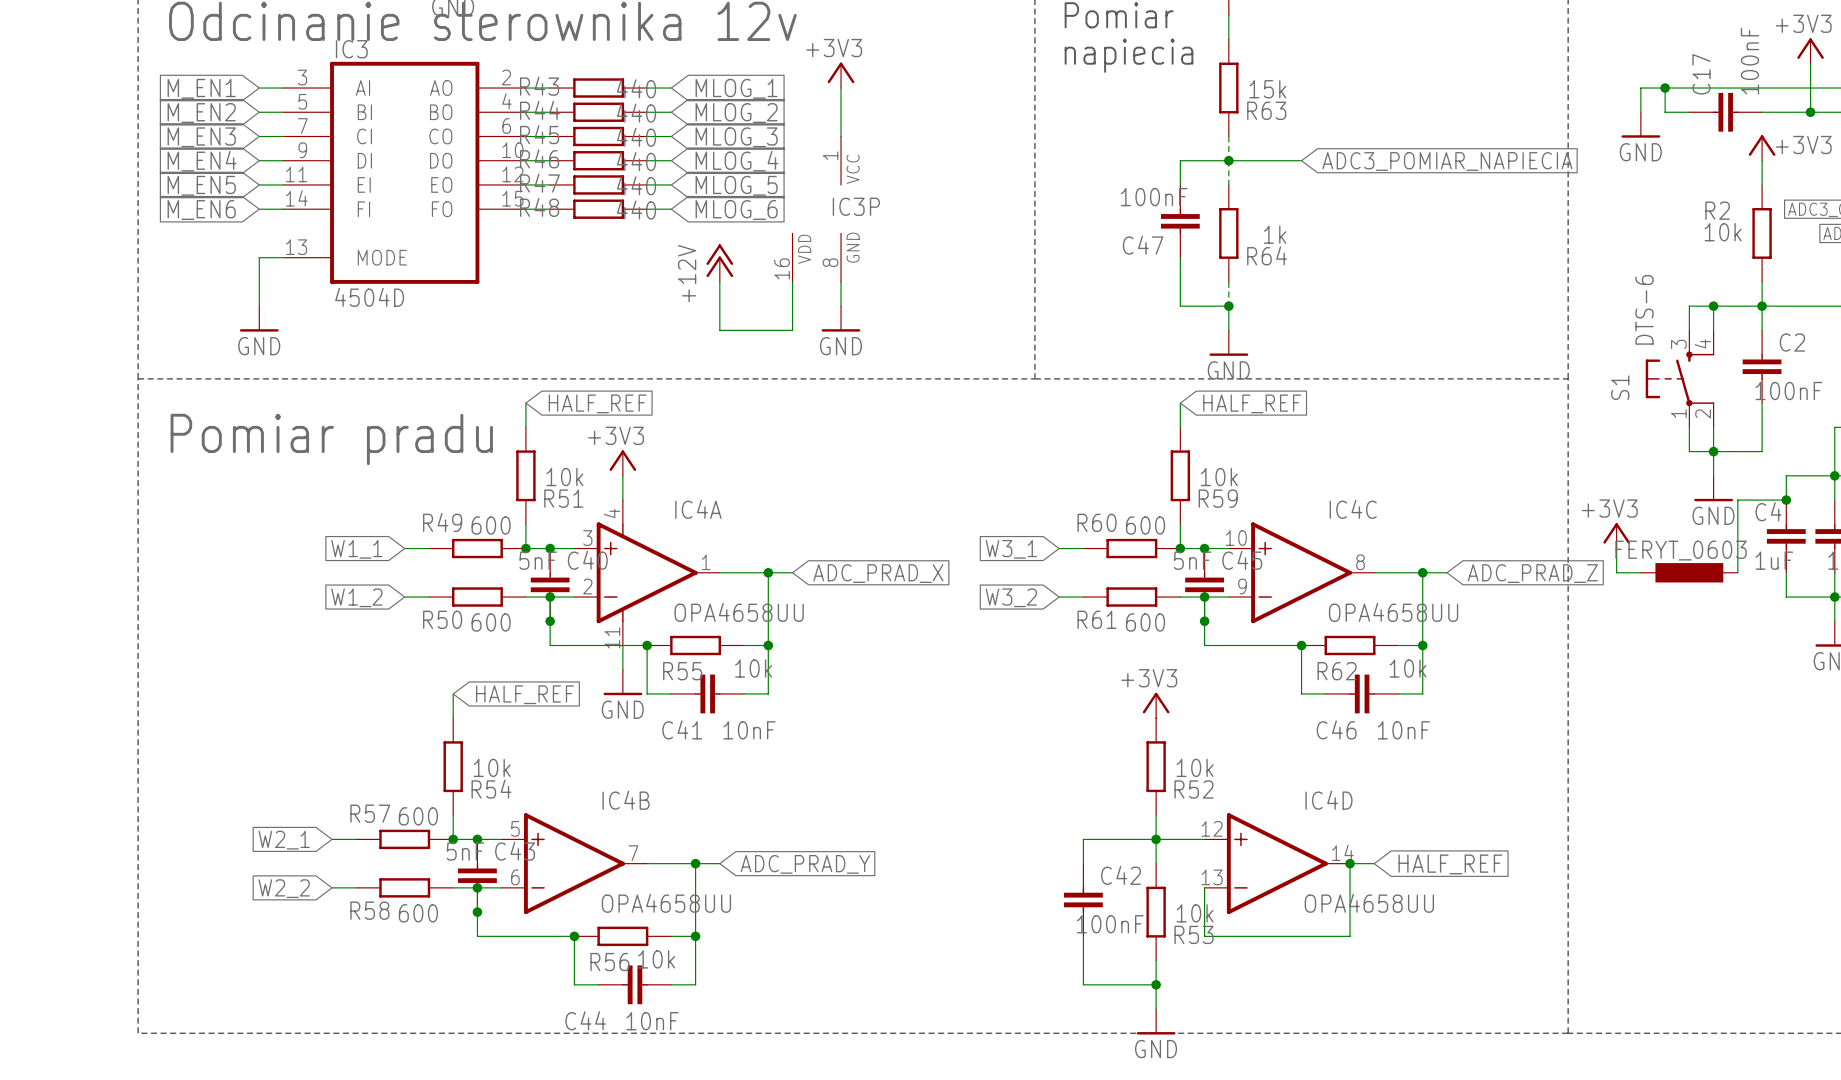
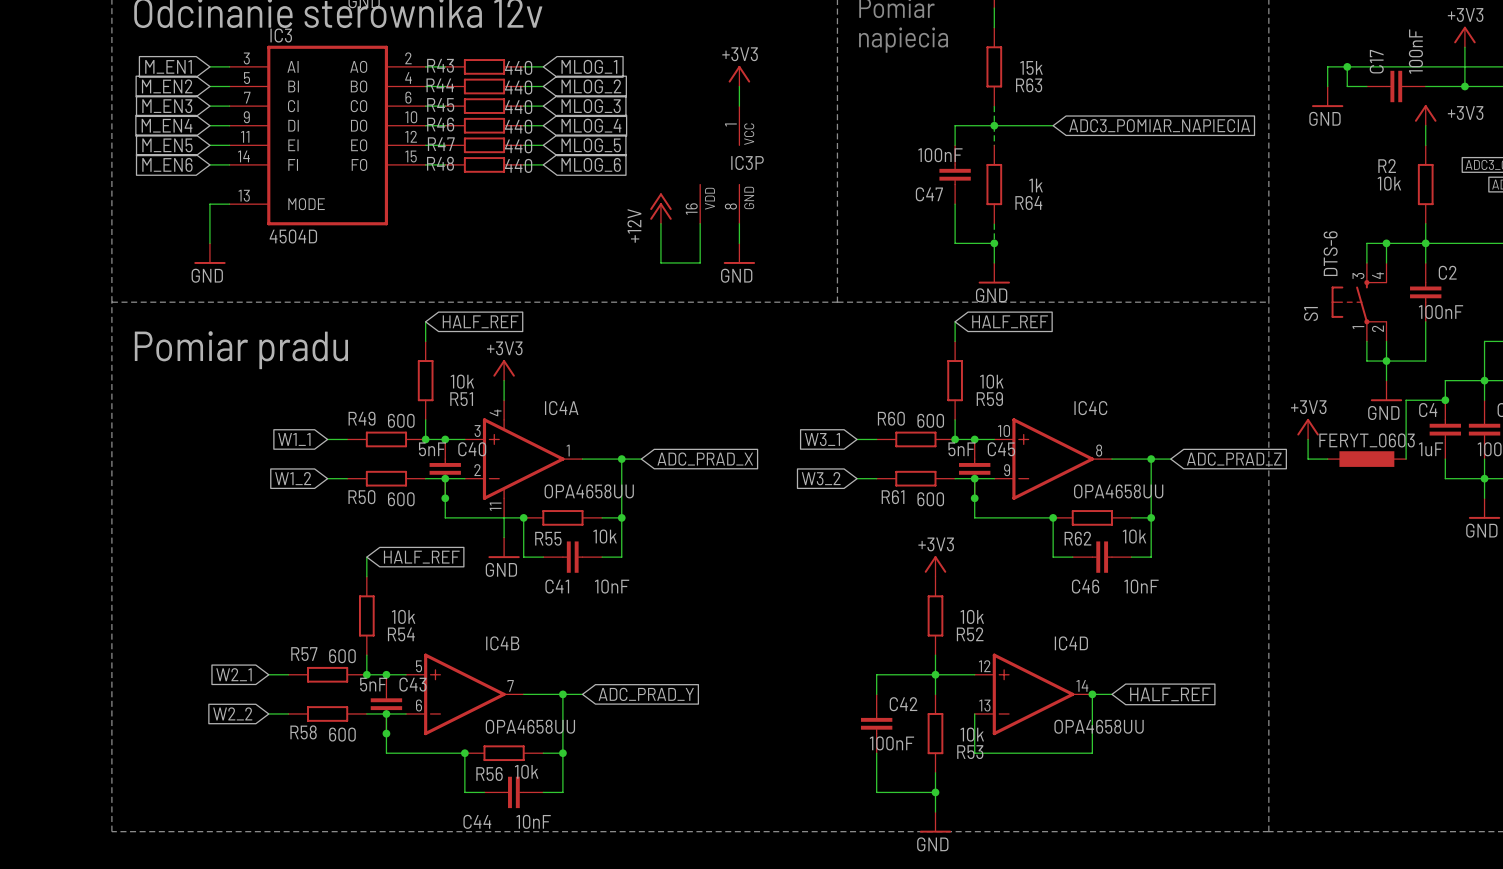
power symbol position: +3V3 (841, 75) -> +3V3 (739, 76)
wire: (841, 88) (841, 136) -> none
wire: none -> (739, 86) (739, 106)
IC3P position: (816, 209) -> (719, 164)
power symbol position: +12V (719, 263) -> +12V (660, 208)
wire: (719, 281) (719, 330) (792, 330) (792, 281) -> none
wire: none -> (660, 223) (660, 262) (700, 262) (700, 223)
wire: (841, 281) (841, 306) -> (739, 223) (739, 243)
power symbol position: GND (841, 318) -> GND (739, 253)

